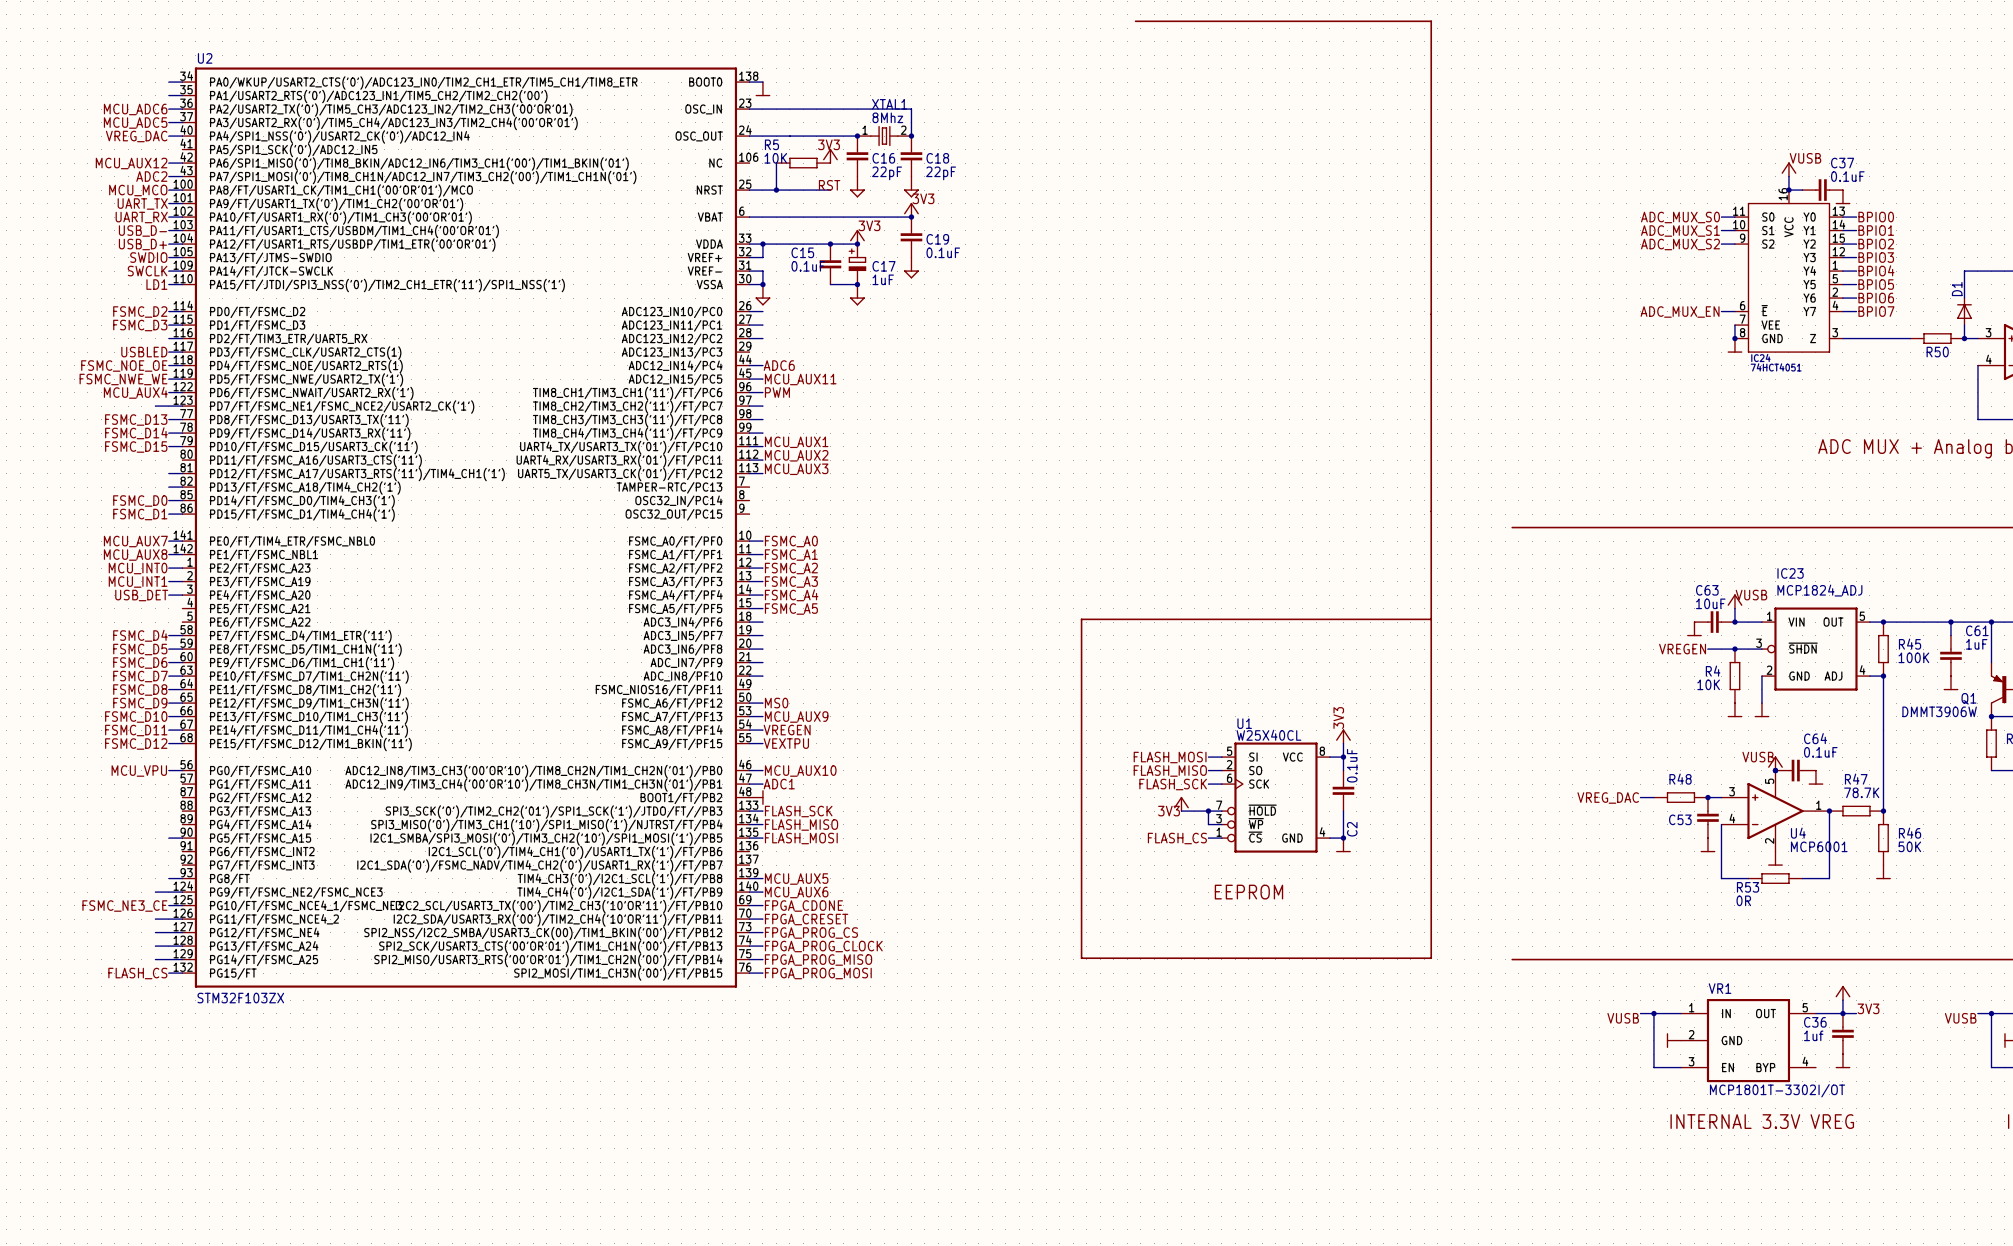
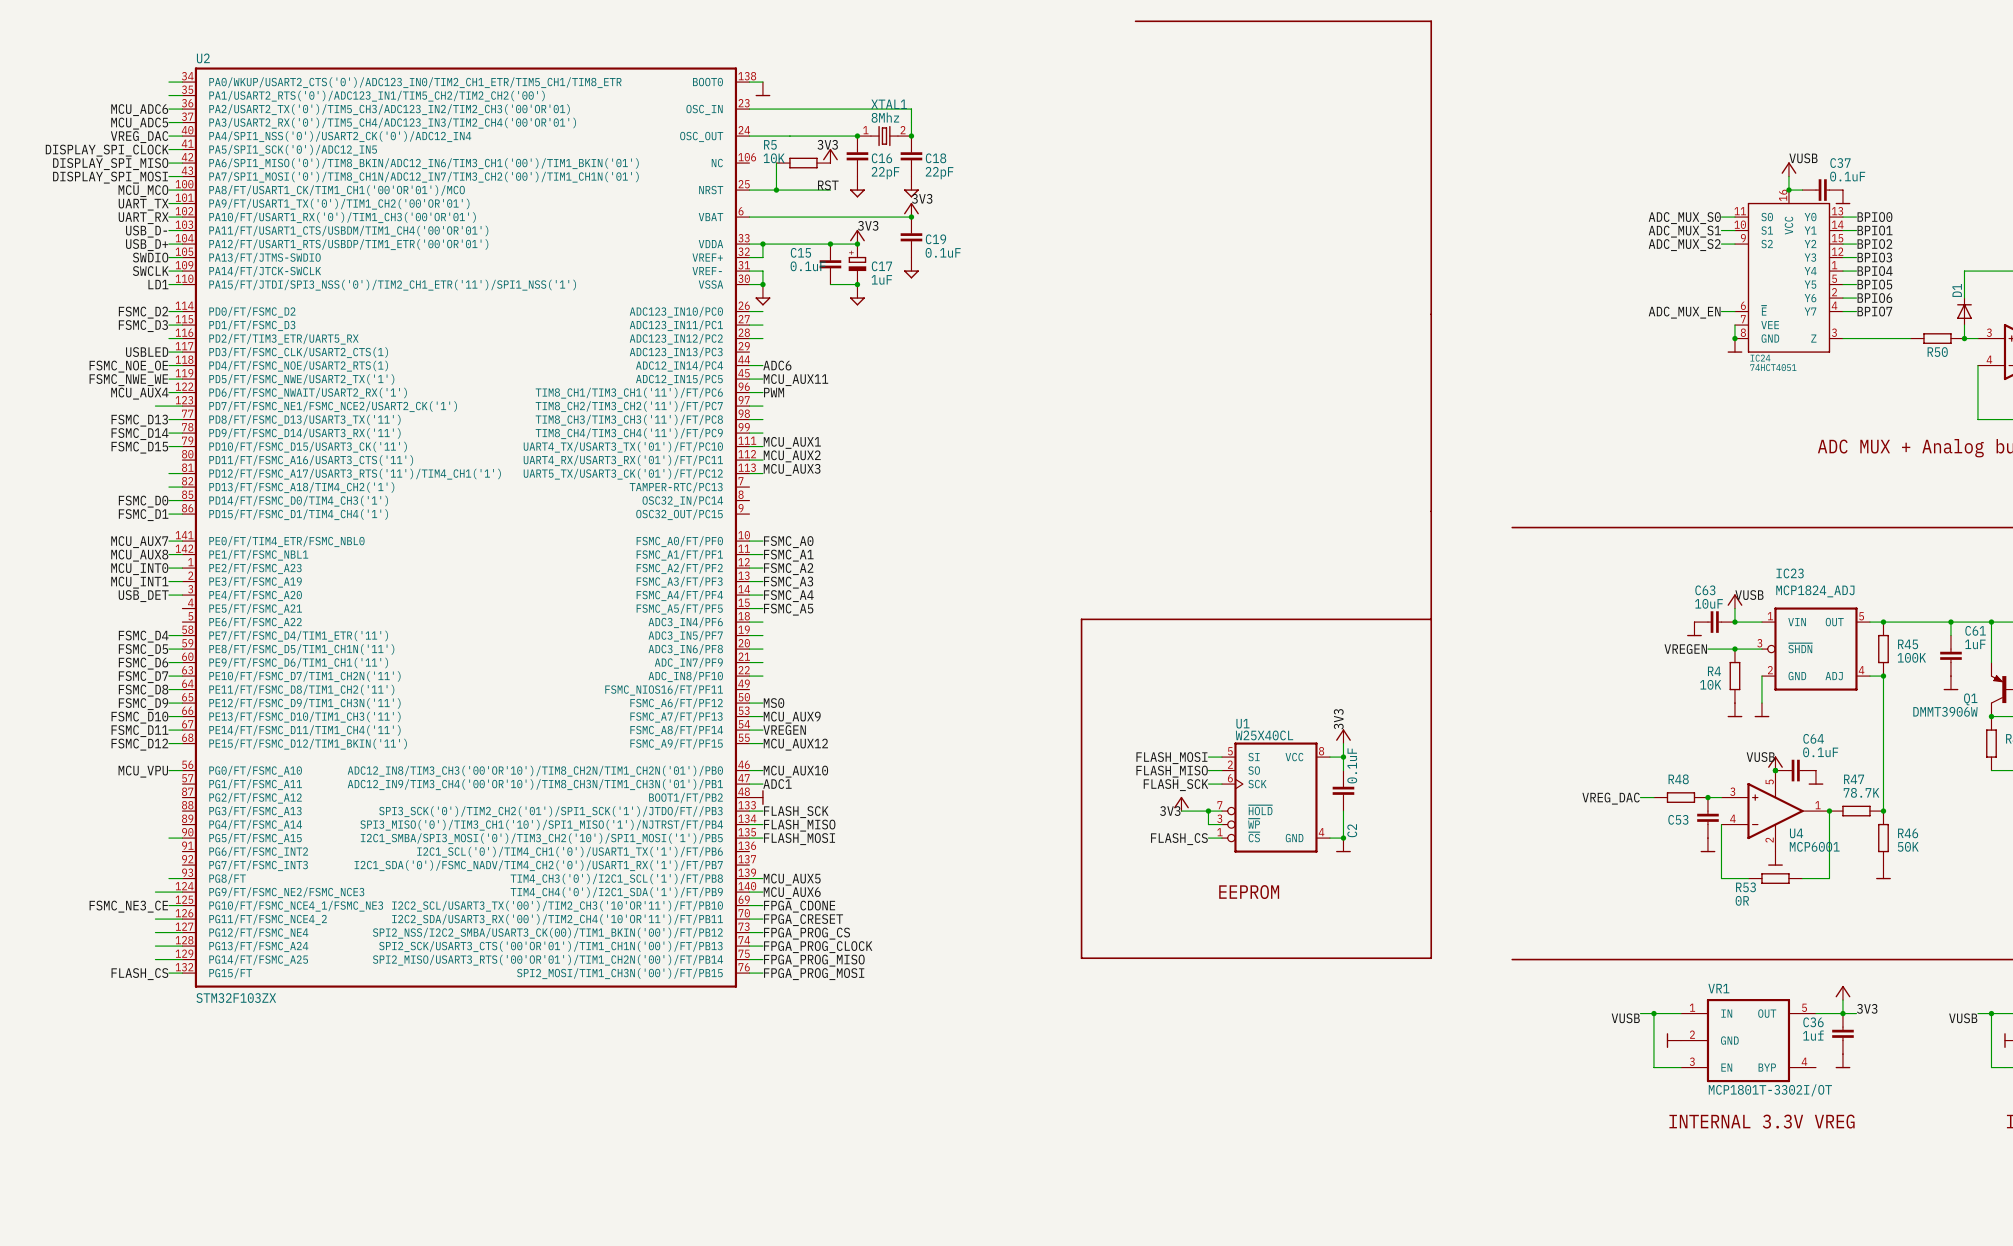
label: none -> DISPLAY_SPI_CLOCK (107, 150)
wire: none -> (168, 149) (182, 149)
label: MCU_AUX12 (131, 163) -> DISPLAY_SPI_MISO (110, 164)
label: ADC2 (151, 176) -> DISPLAY_SPI_MOSI (110, 177)
label: VEXTPU (786, 743) -> MCU_AUX12 (795, 744)

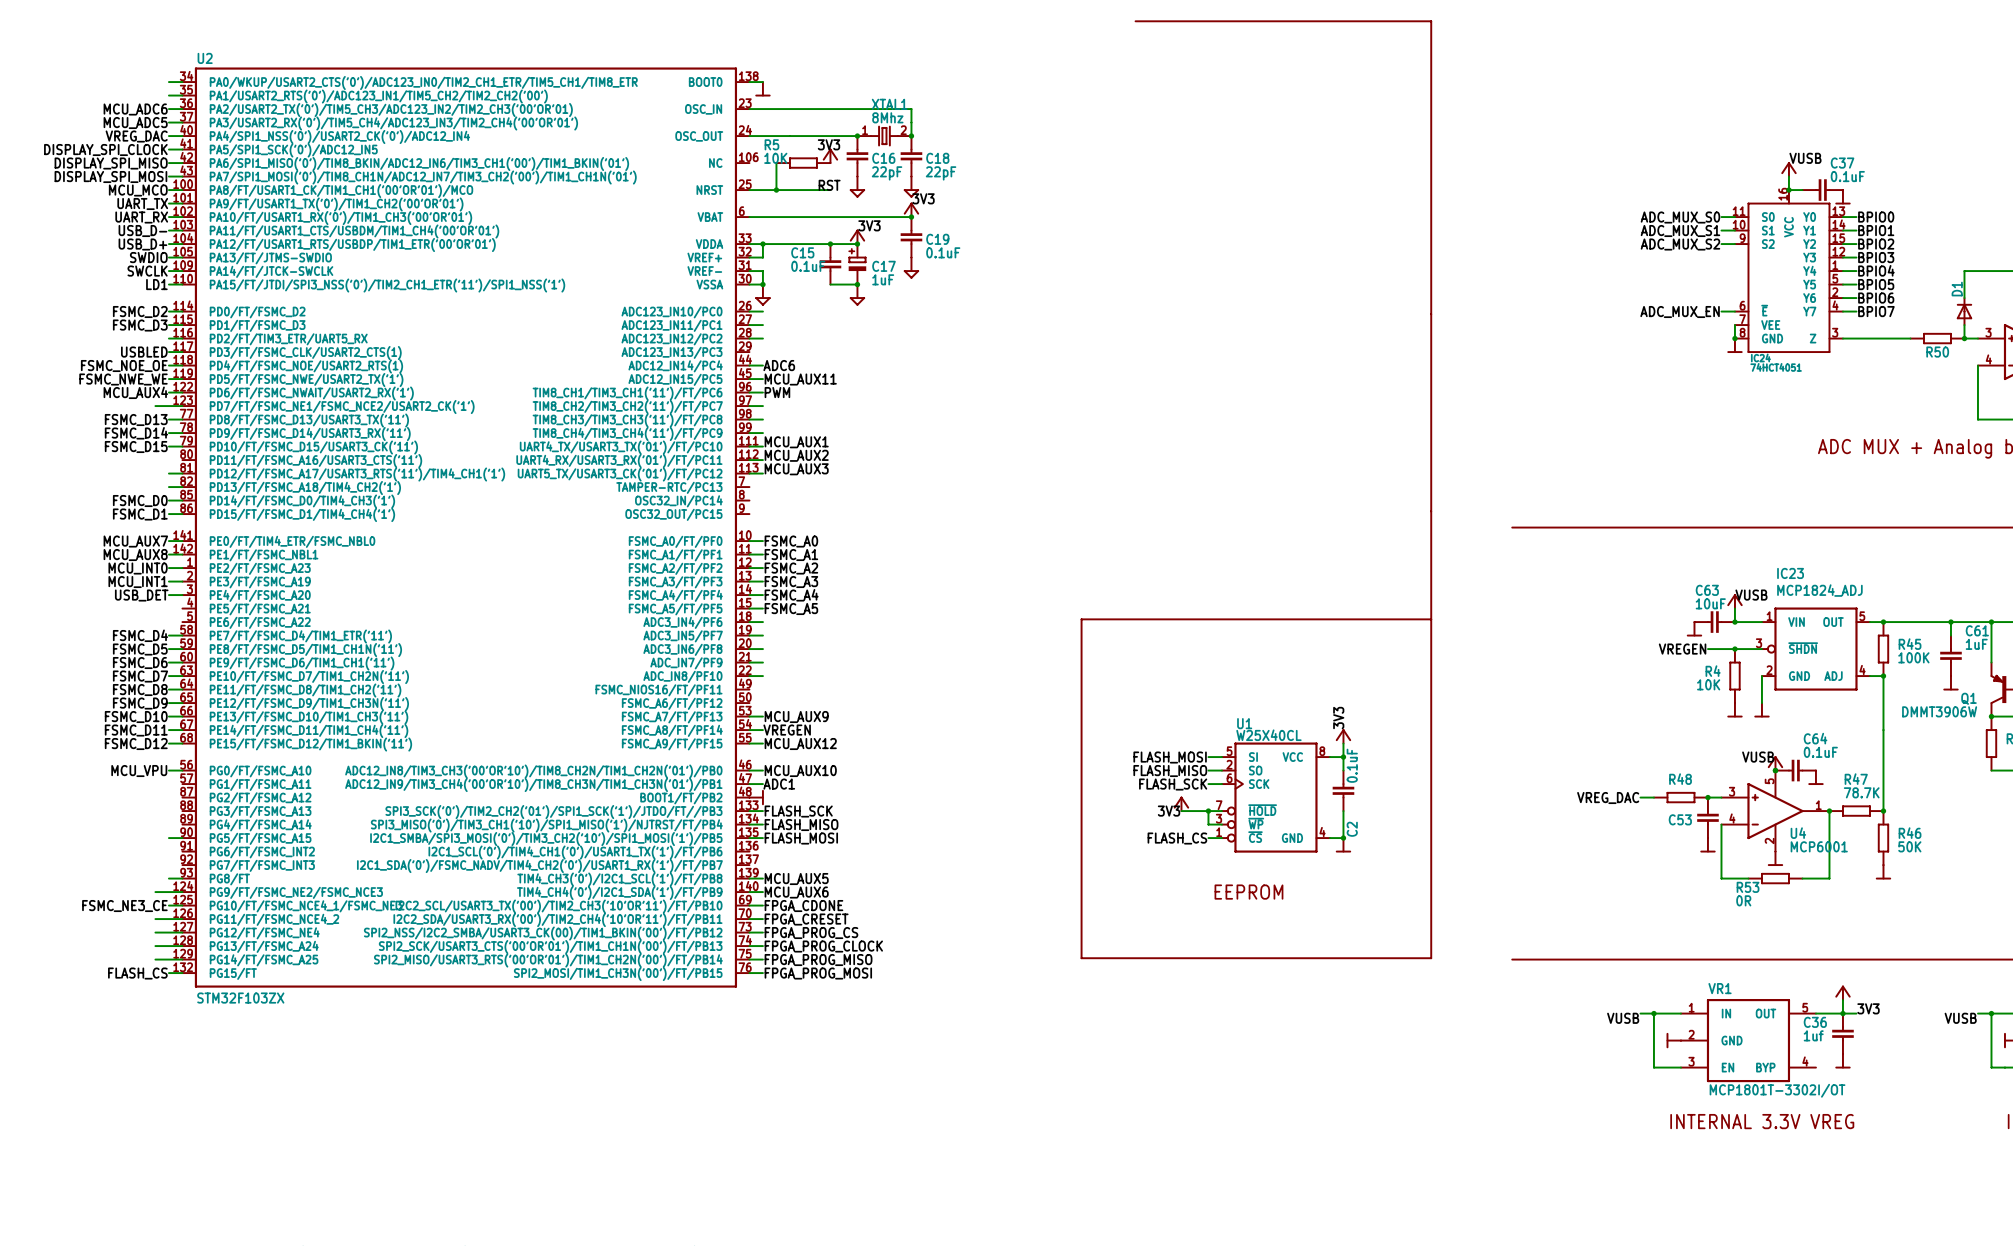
wire: (749, 703) (762, 703) -> none
label: MS0 (773, 703) -> none

